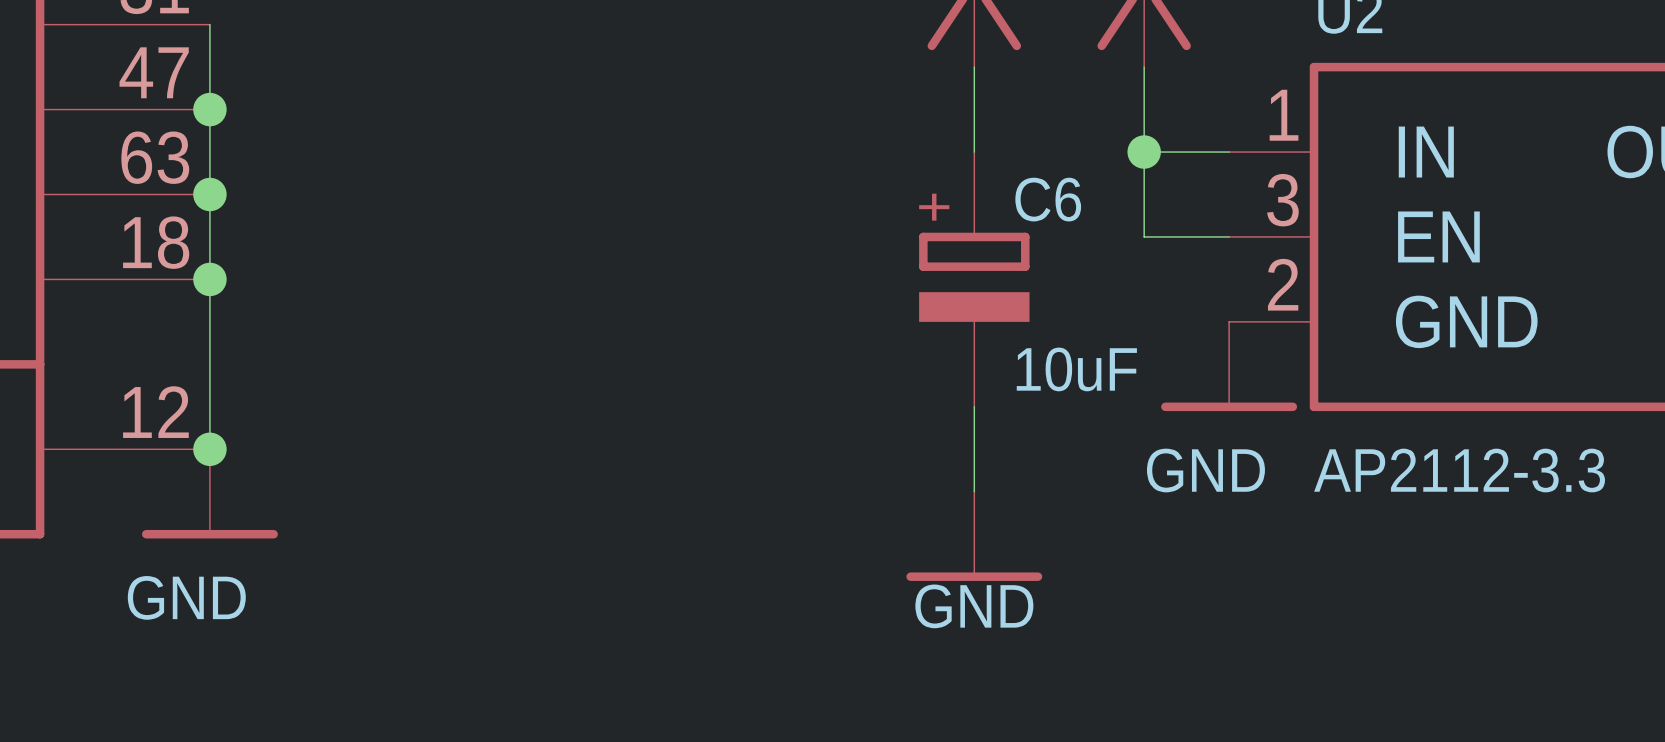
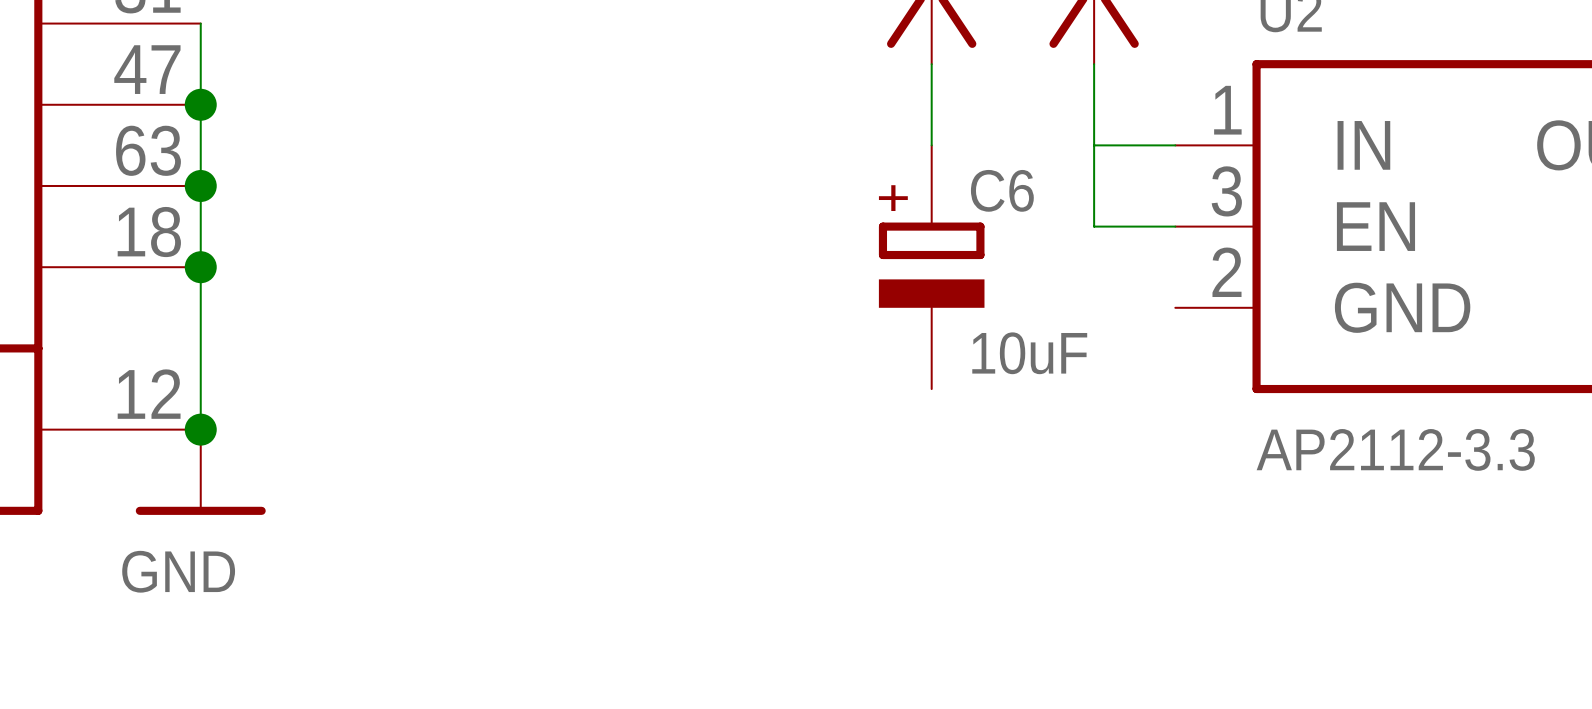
junction: (1144, 152) -> none
power symbol: GND (1229, 366) -> none
wire: (974, 406) (974, 491) -> none
power symbol: GND (974, 536) -> none

